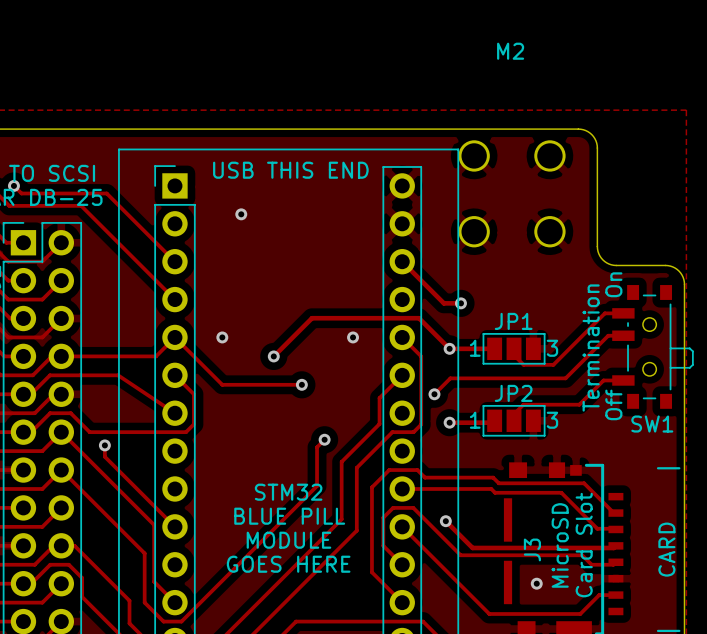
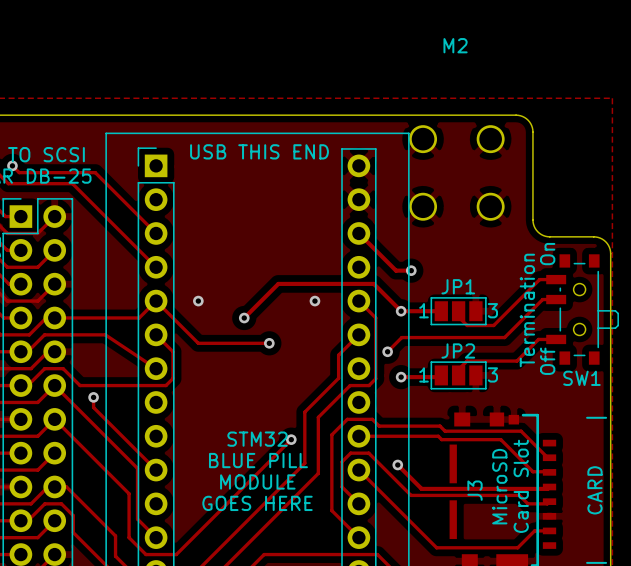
via: (241, 214) -> none
track: (324, 439) (317, 447) (317, 486) (181, 621) -> (291, 439) (176, 554) (161, 554)
via position: (324, 439) -> (291, 439)
via: (536, 583) -> none

